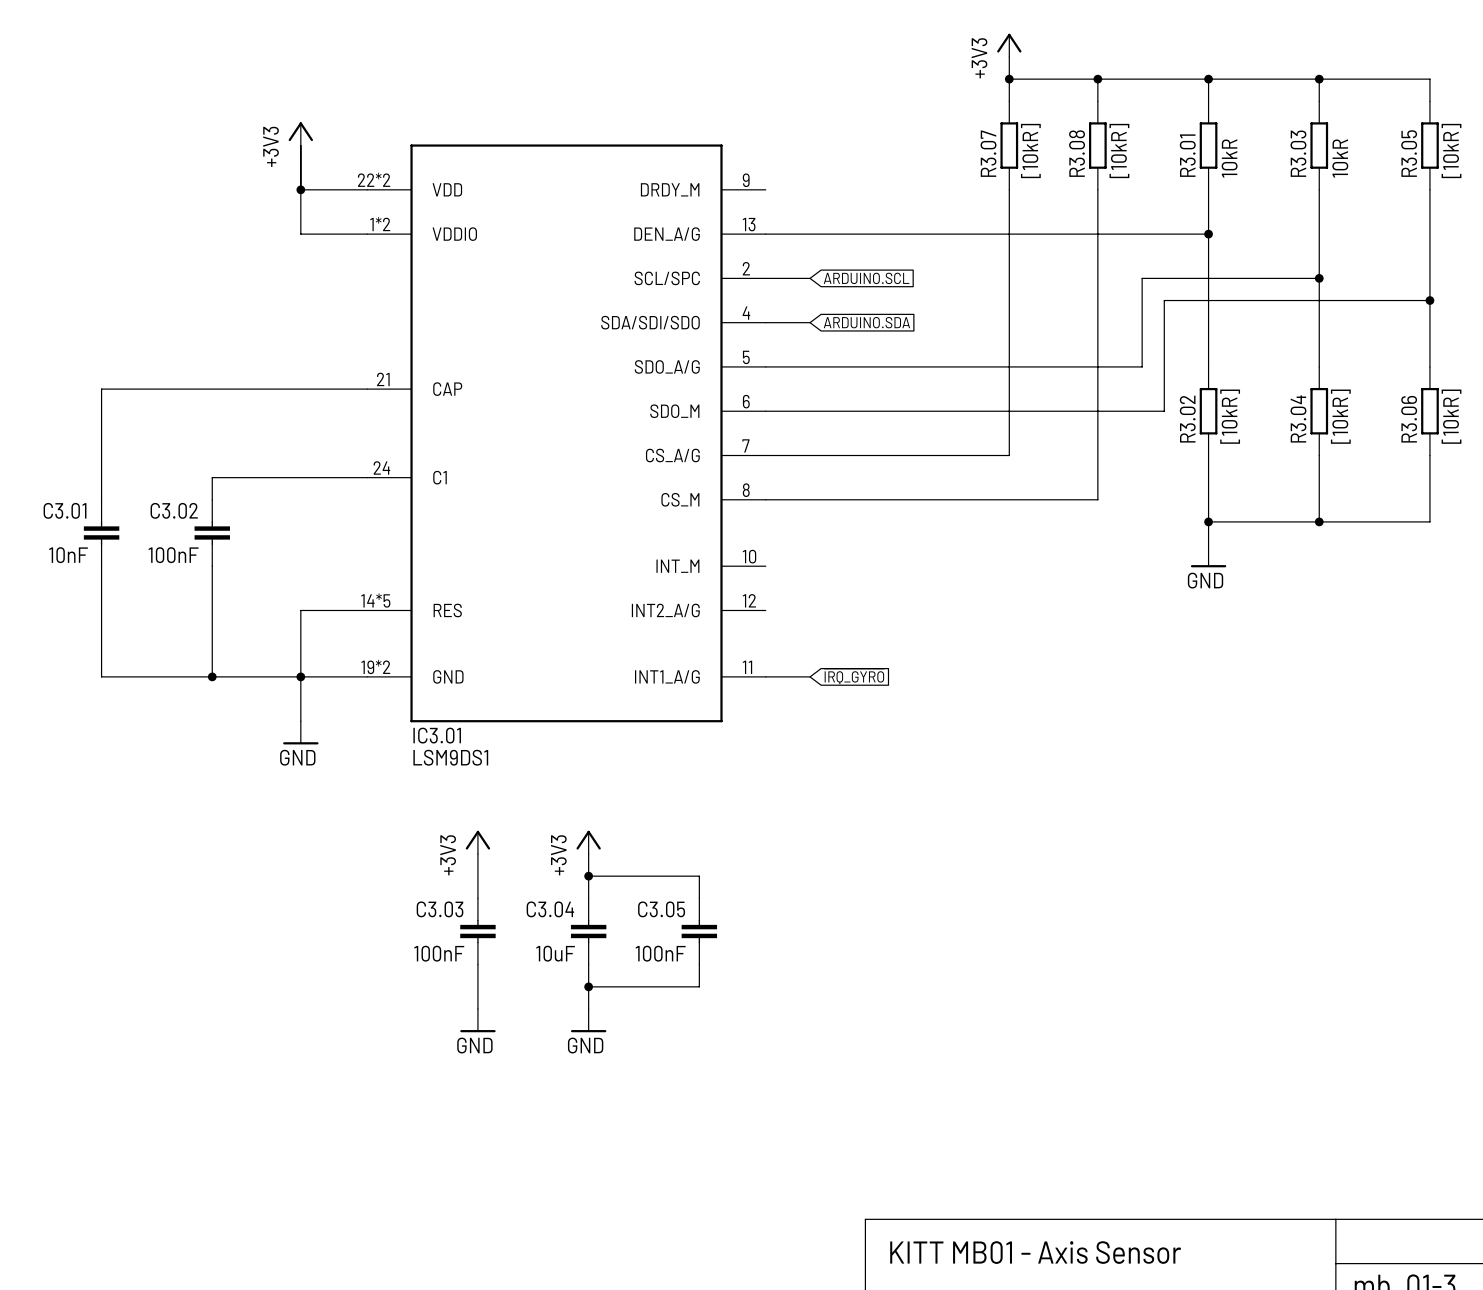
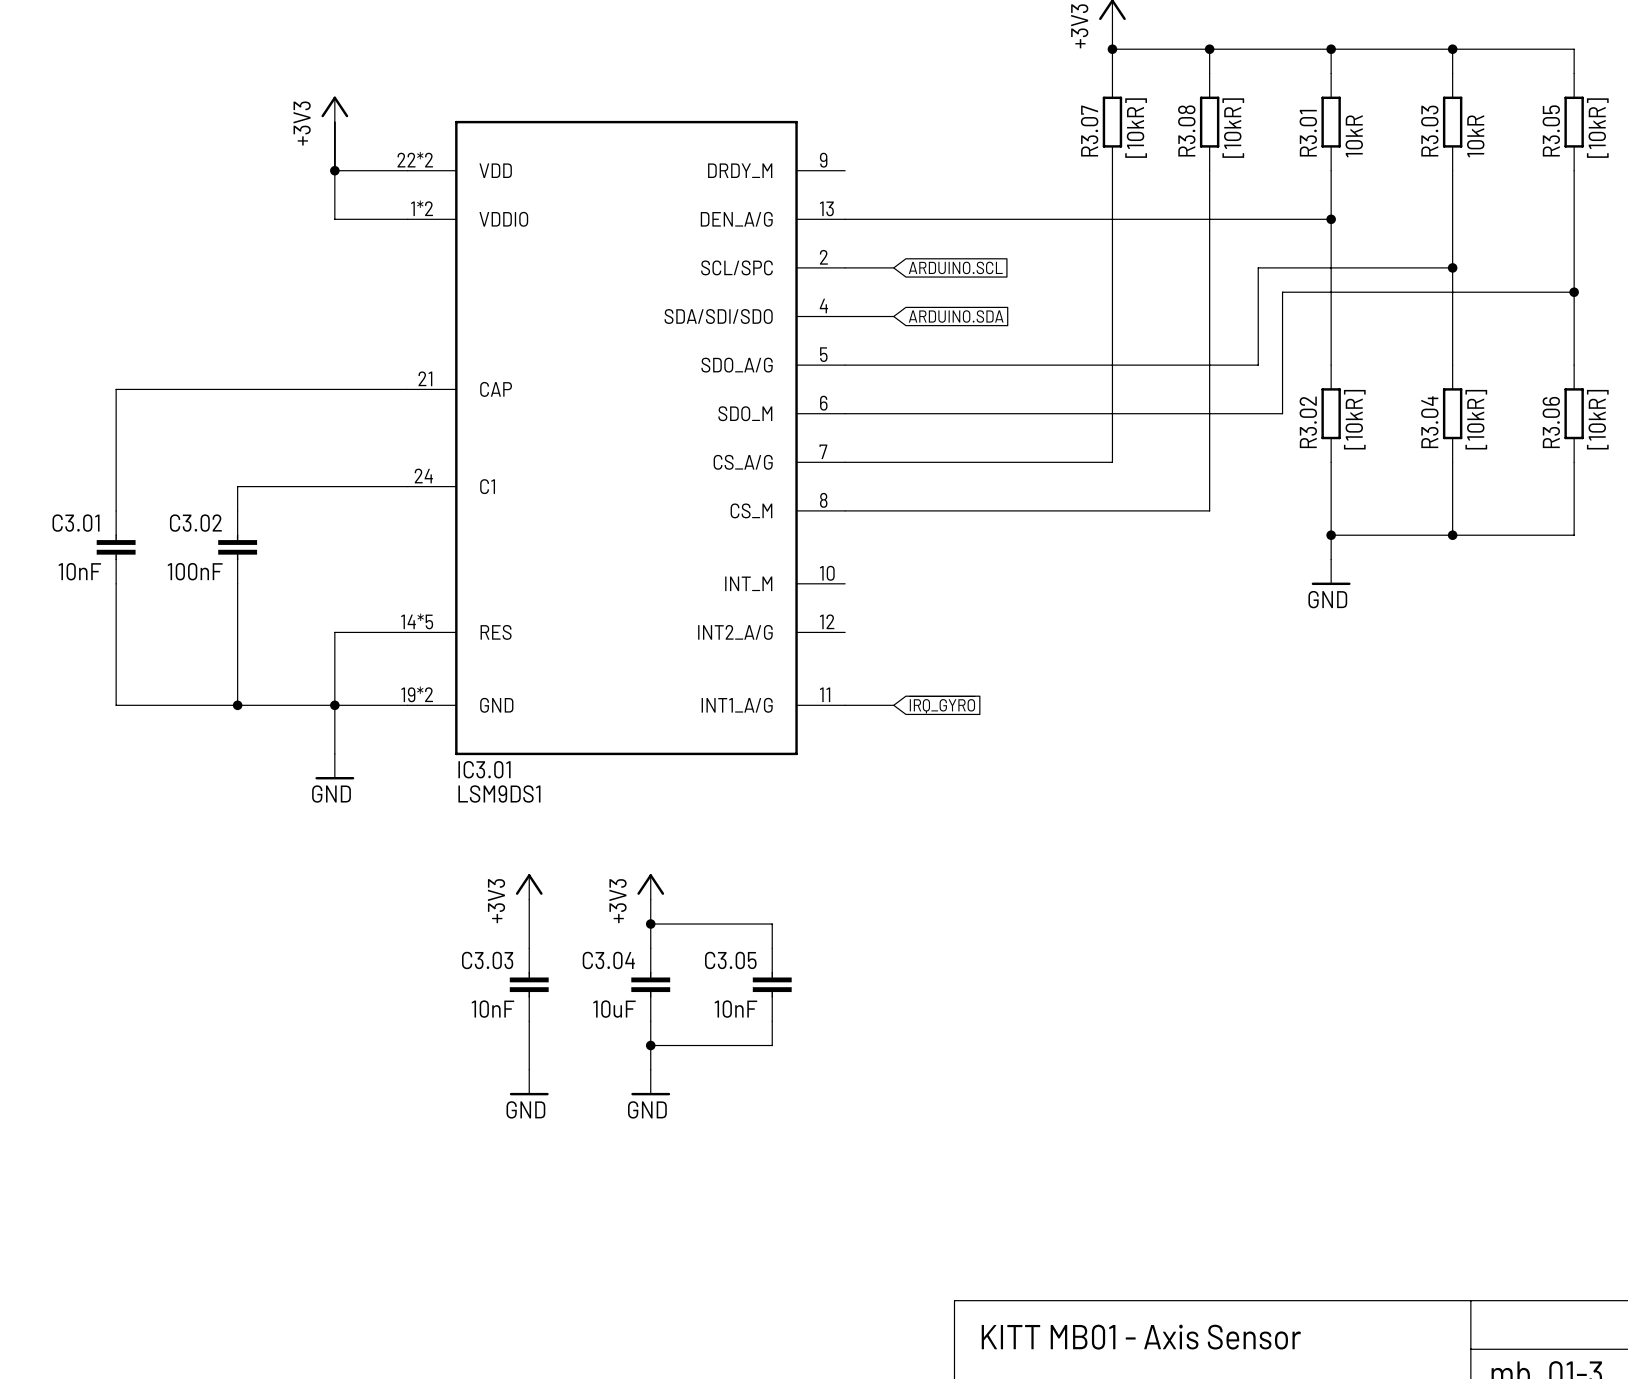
C3.03 value: 100nF (439, 953) -> 10nF (492, 1009)
C3.05 value: 100nF (660, 953) -> 10nF (735, 1009)

